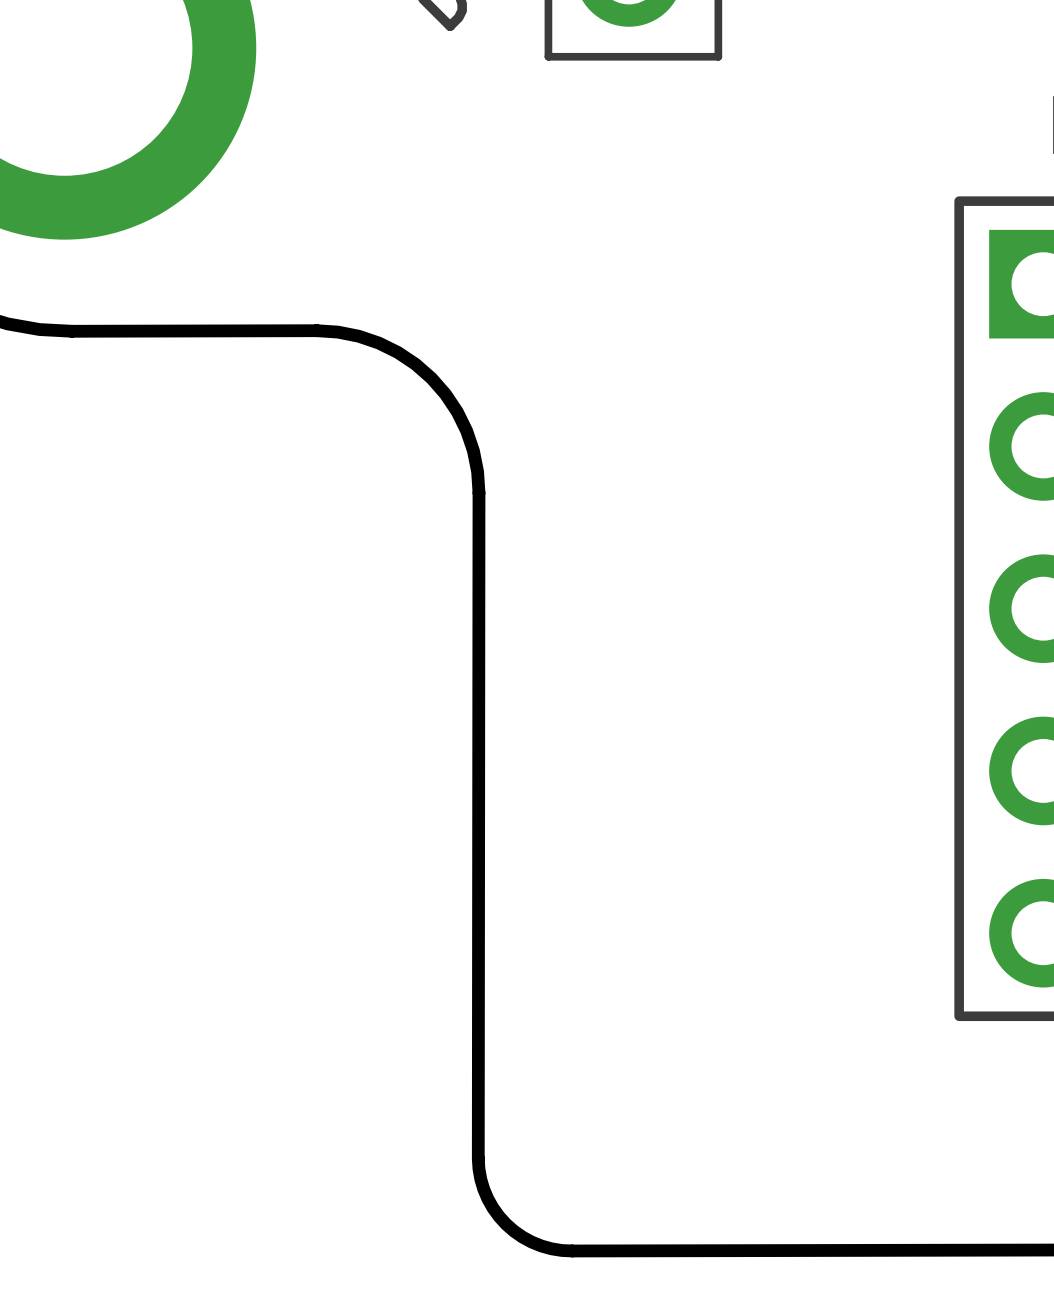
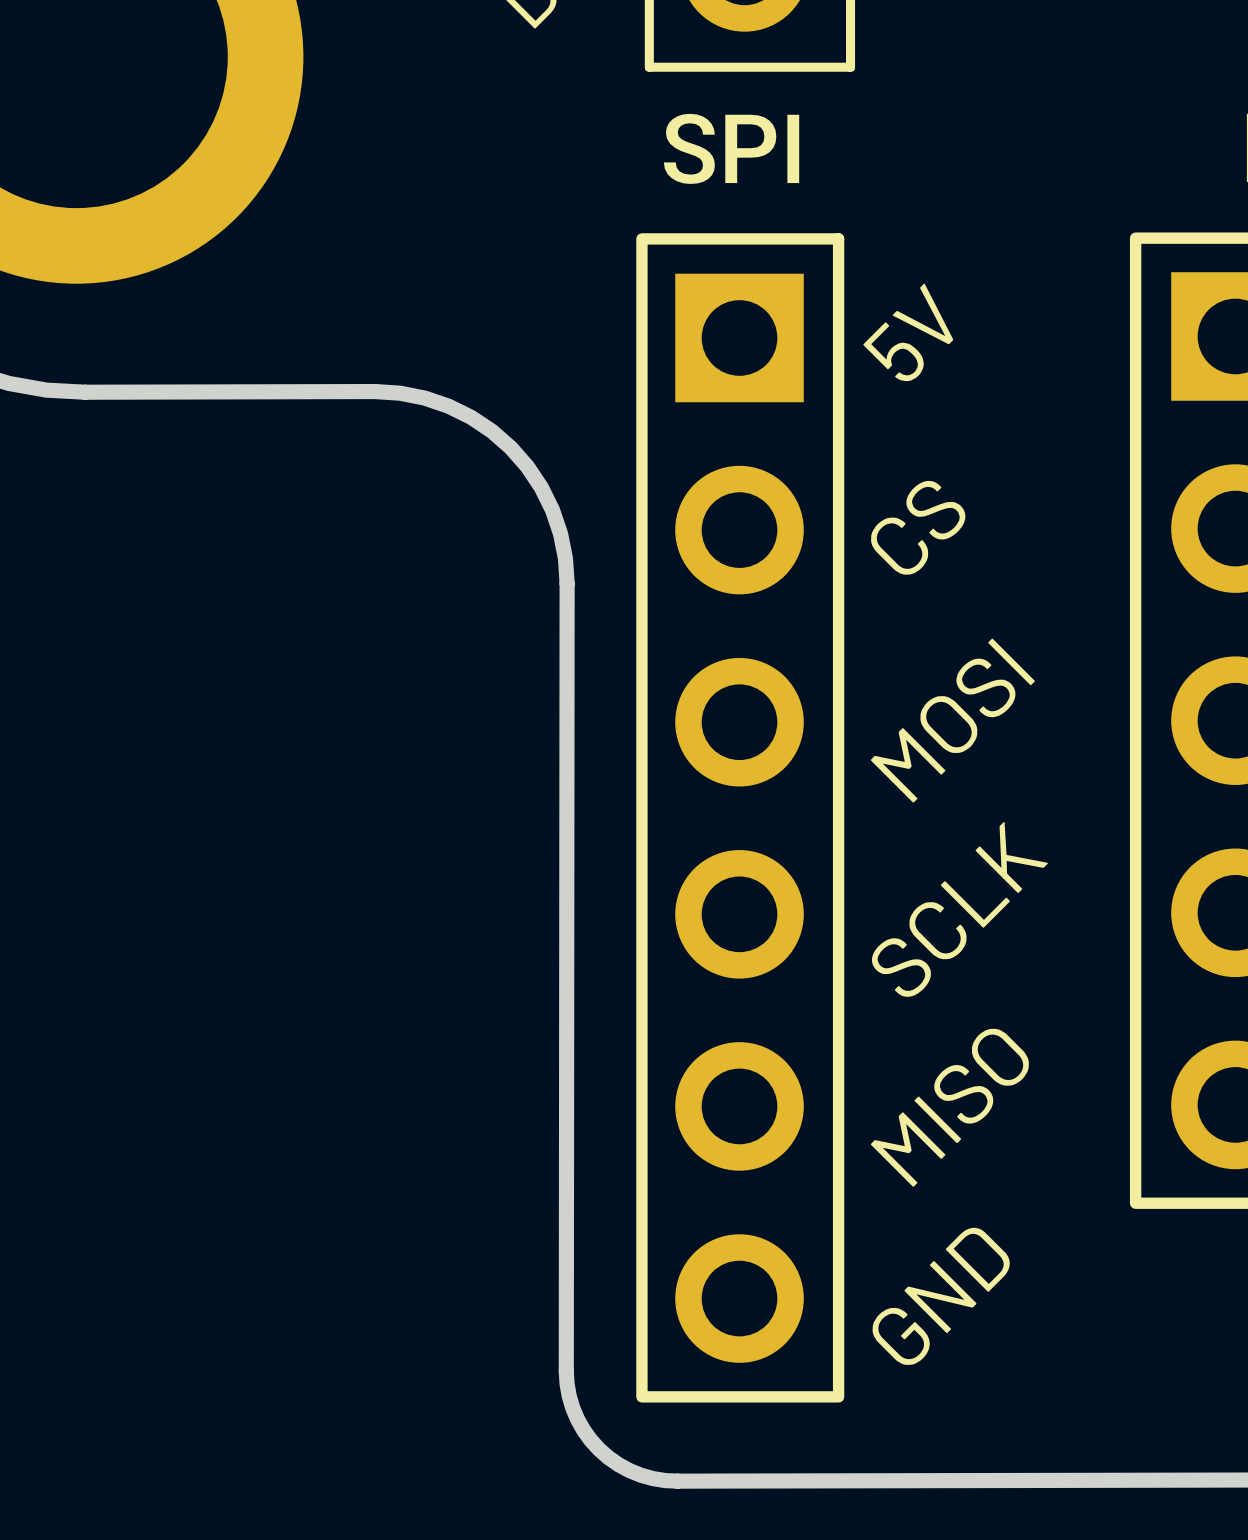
drawing: none -> [663, 113, 800, 184]
text: none -> 5V (908, 332)
text: none -> CS (918, 527)
text: none -> MOSI (952, 720)
part: none -> (740, 817)
text: none -> SCLK (959, 909)
text: none -> MISO (950, 1107)
text: none -> GND (940, 1296)

